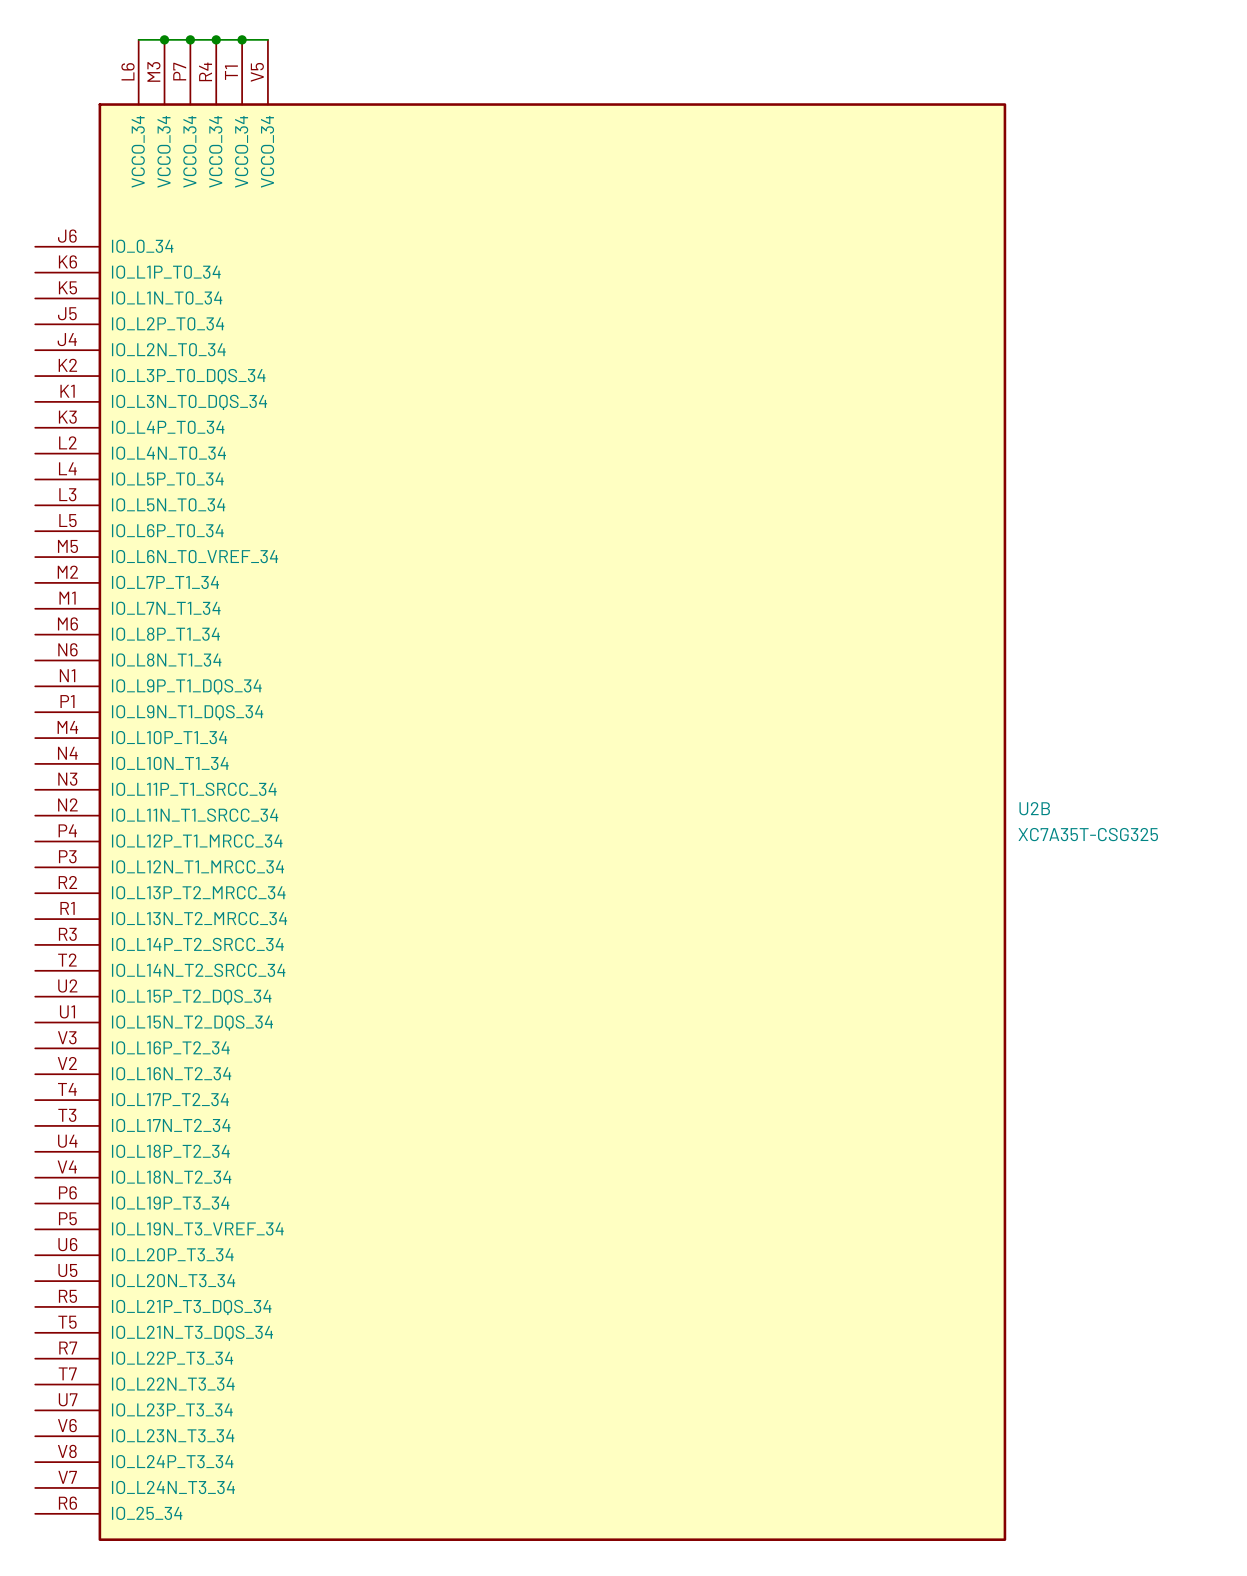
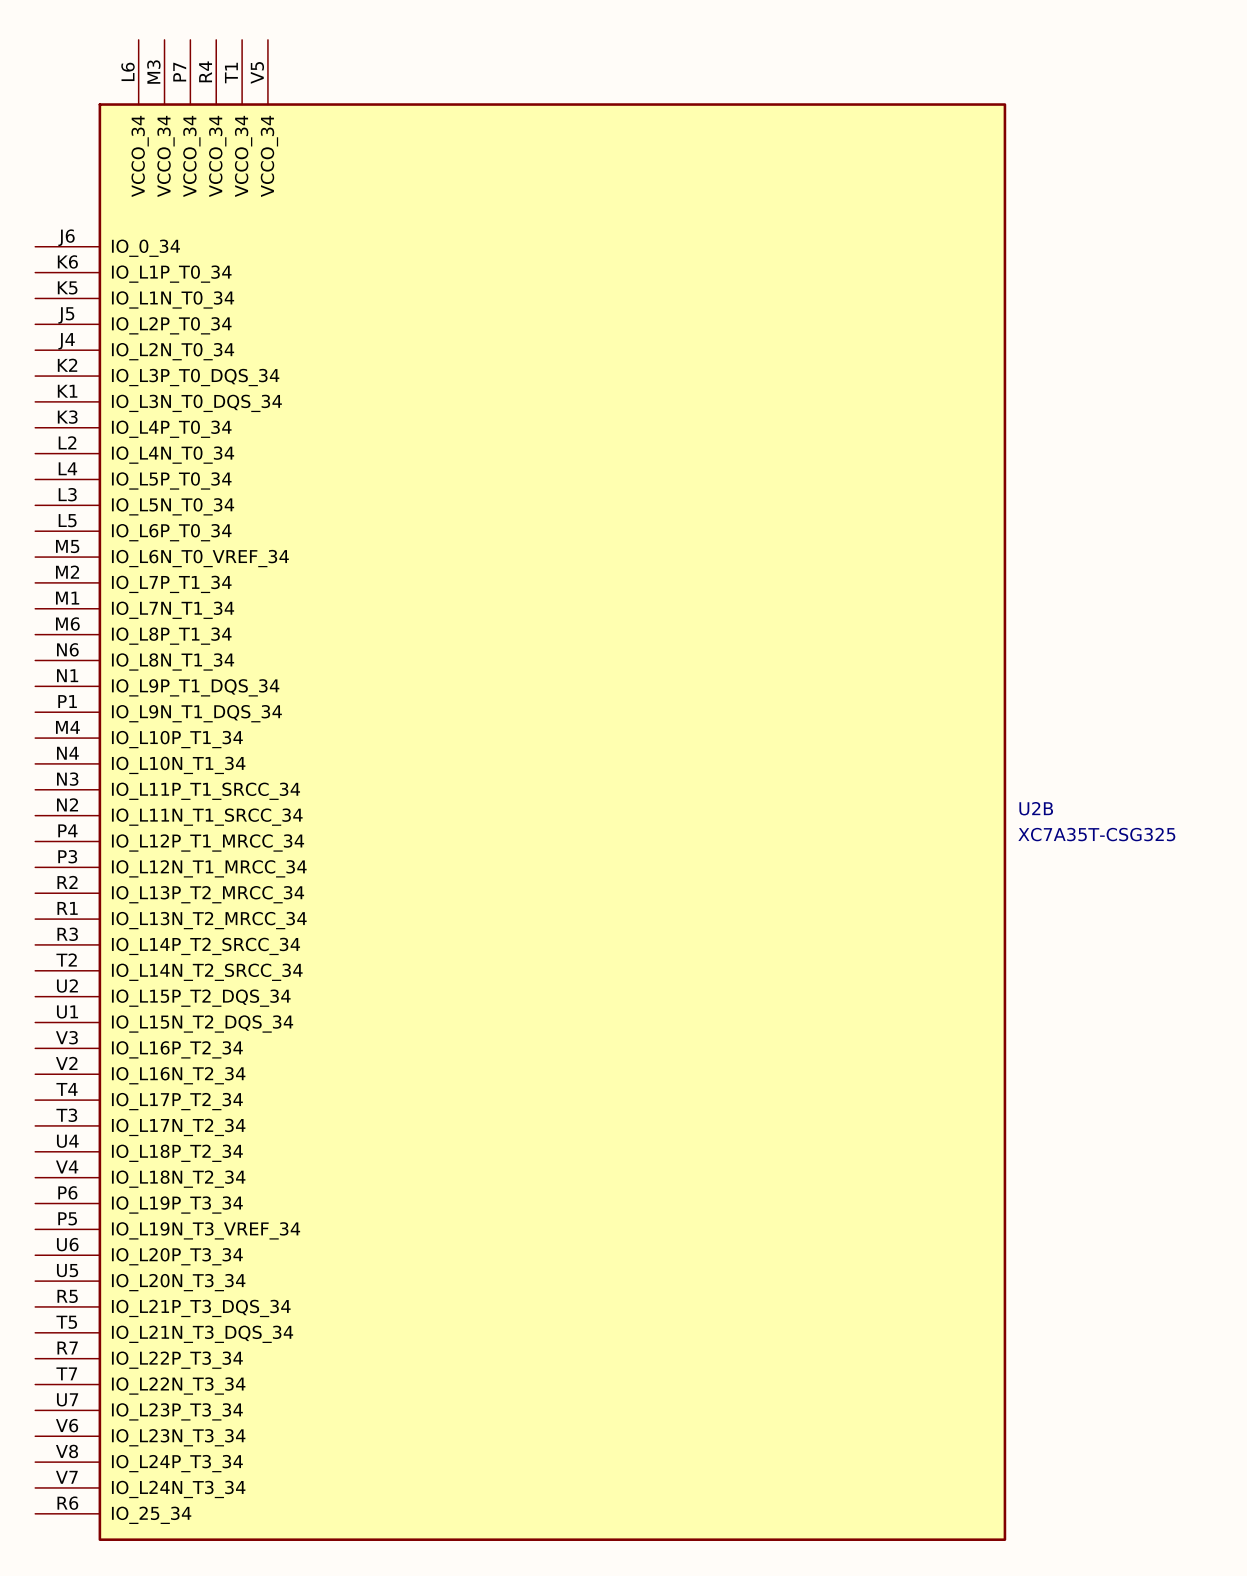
wire: (138, 39) (267, 39) -> none
junction: (164, 39) -> none
junction: (190, 39) -> none
junction: (216, 39) -> none
junction: (242, 39) -> none

